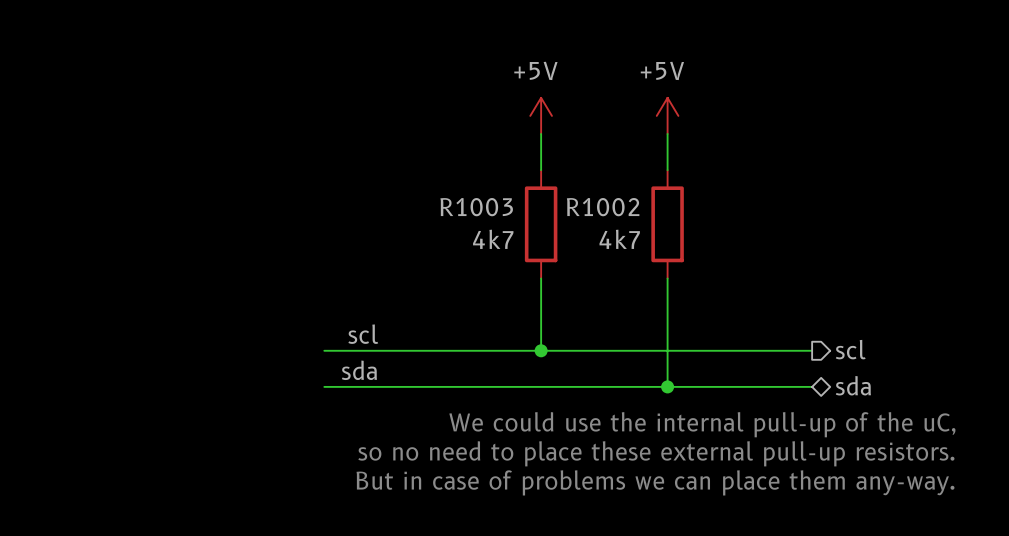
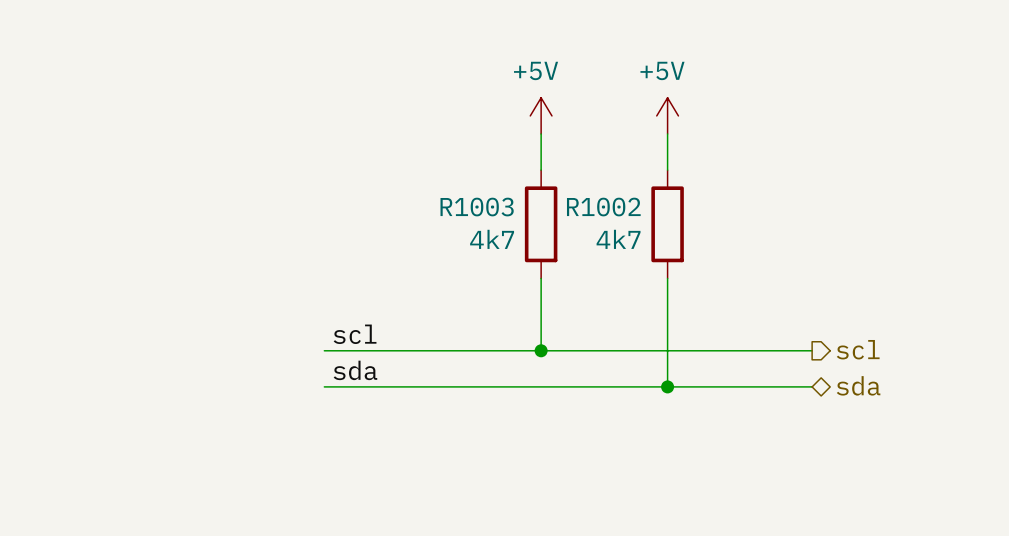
text: We could use the internal pull-up of the uC, (702, 424) -> none
text: so no need to place these external pull-up resistors. (656, 453) -> none
text: But in case of problems we can place them any-way. (655, 482) -> none

